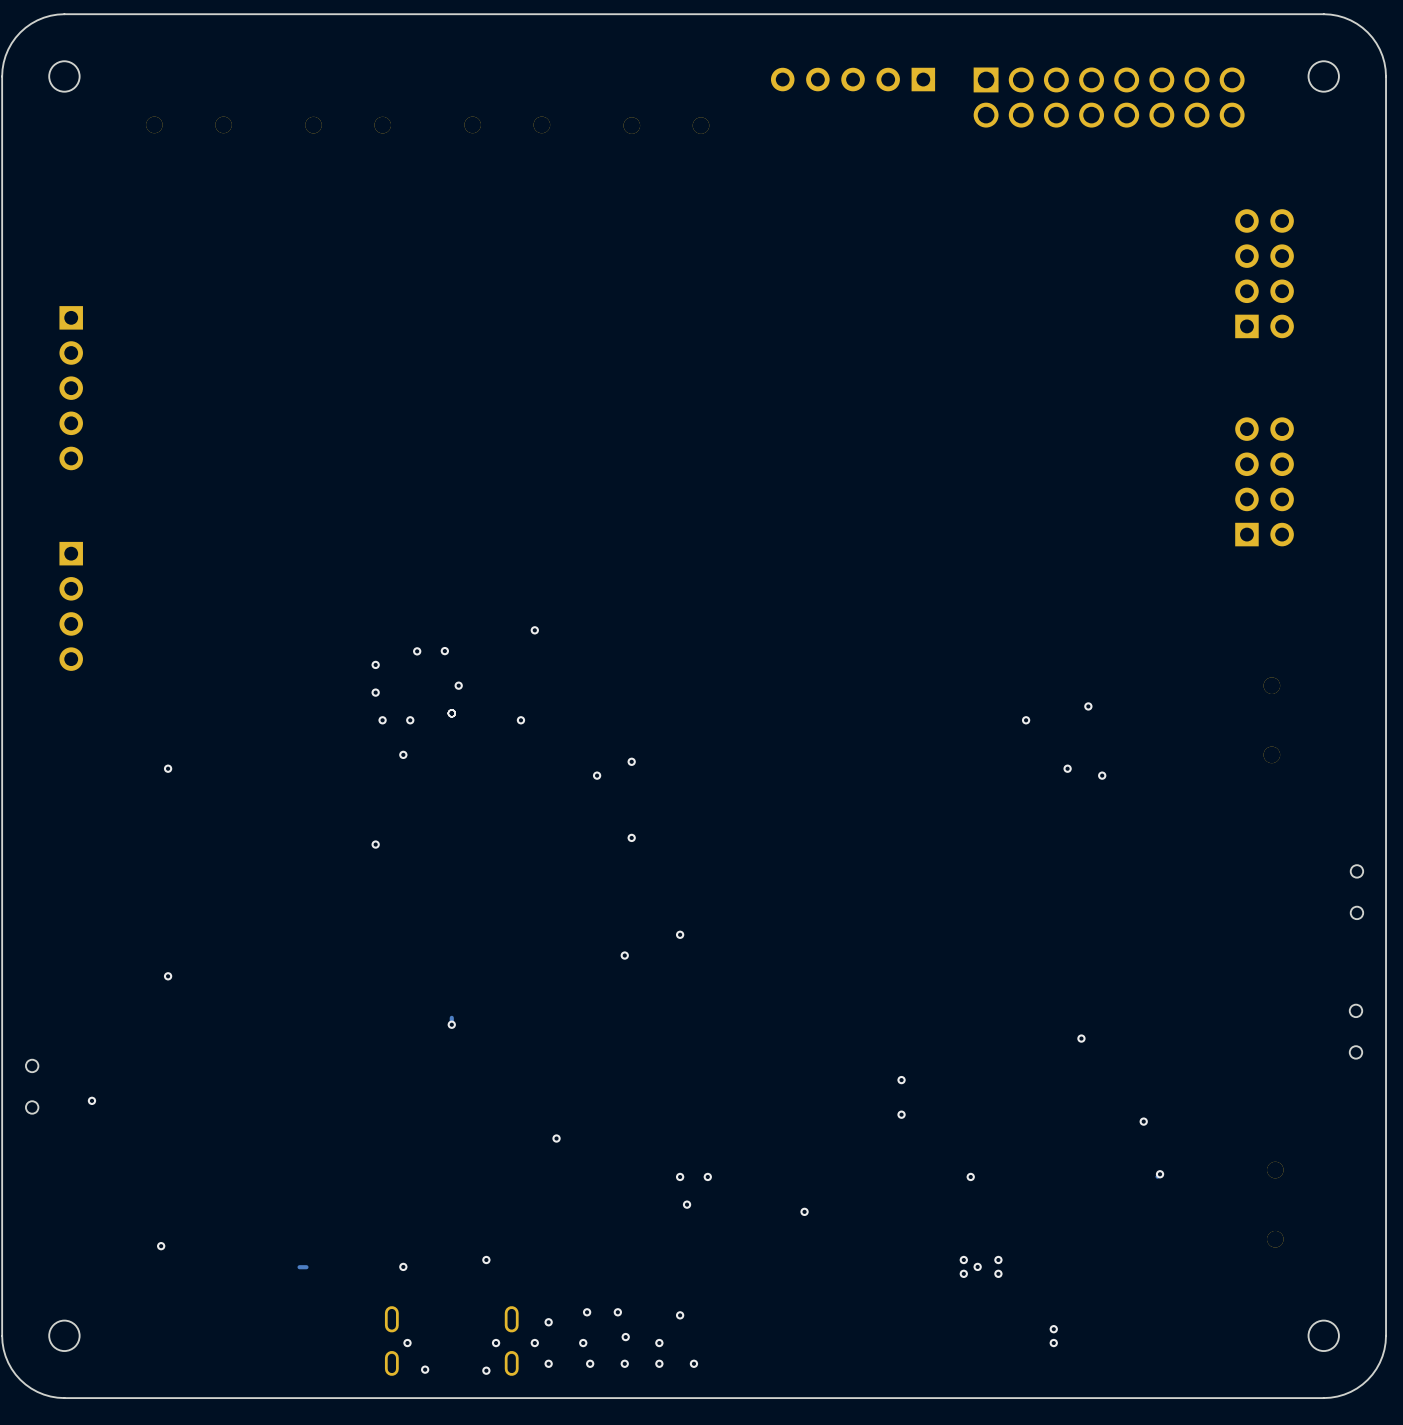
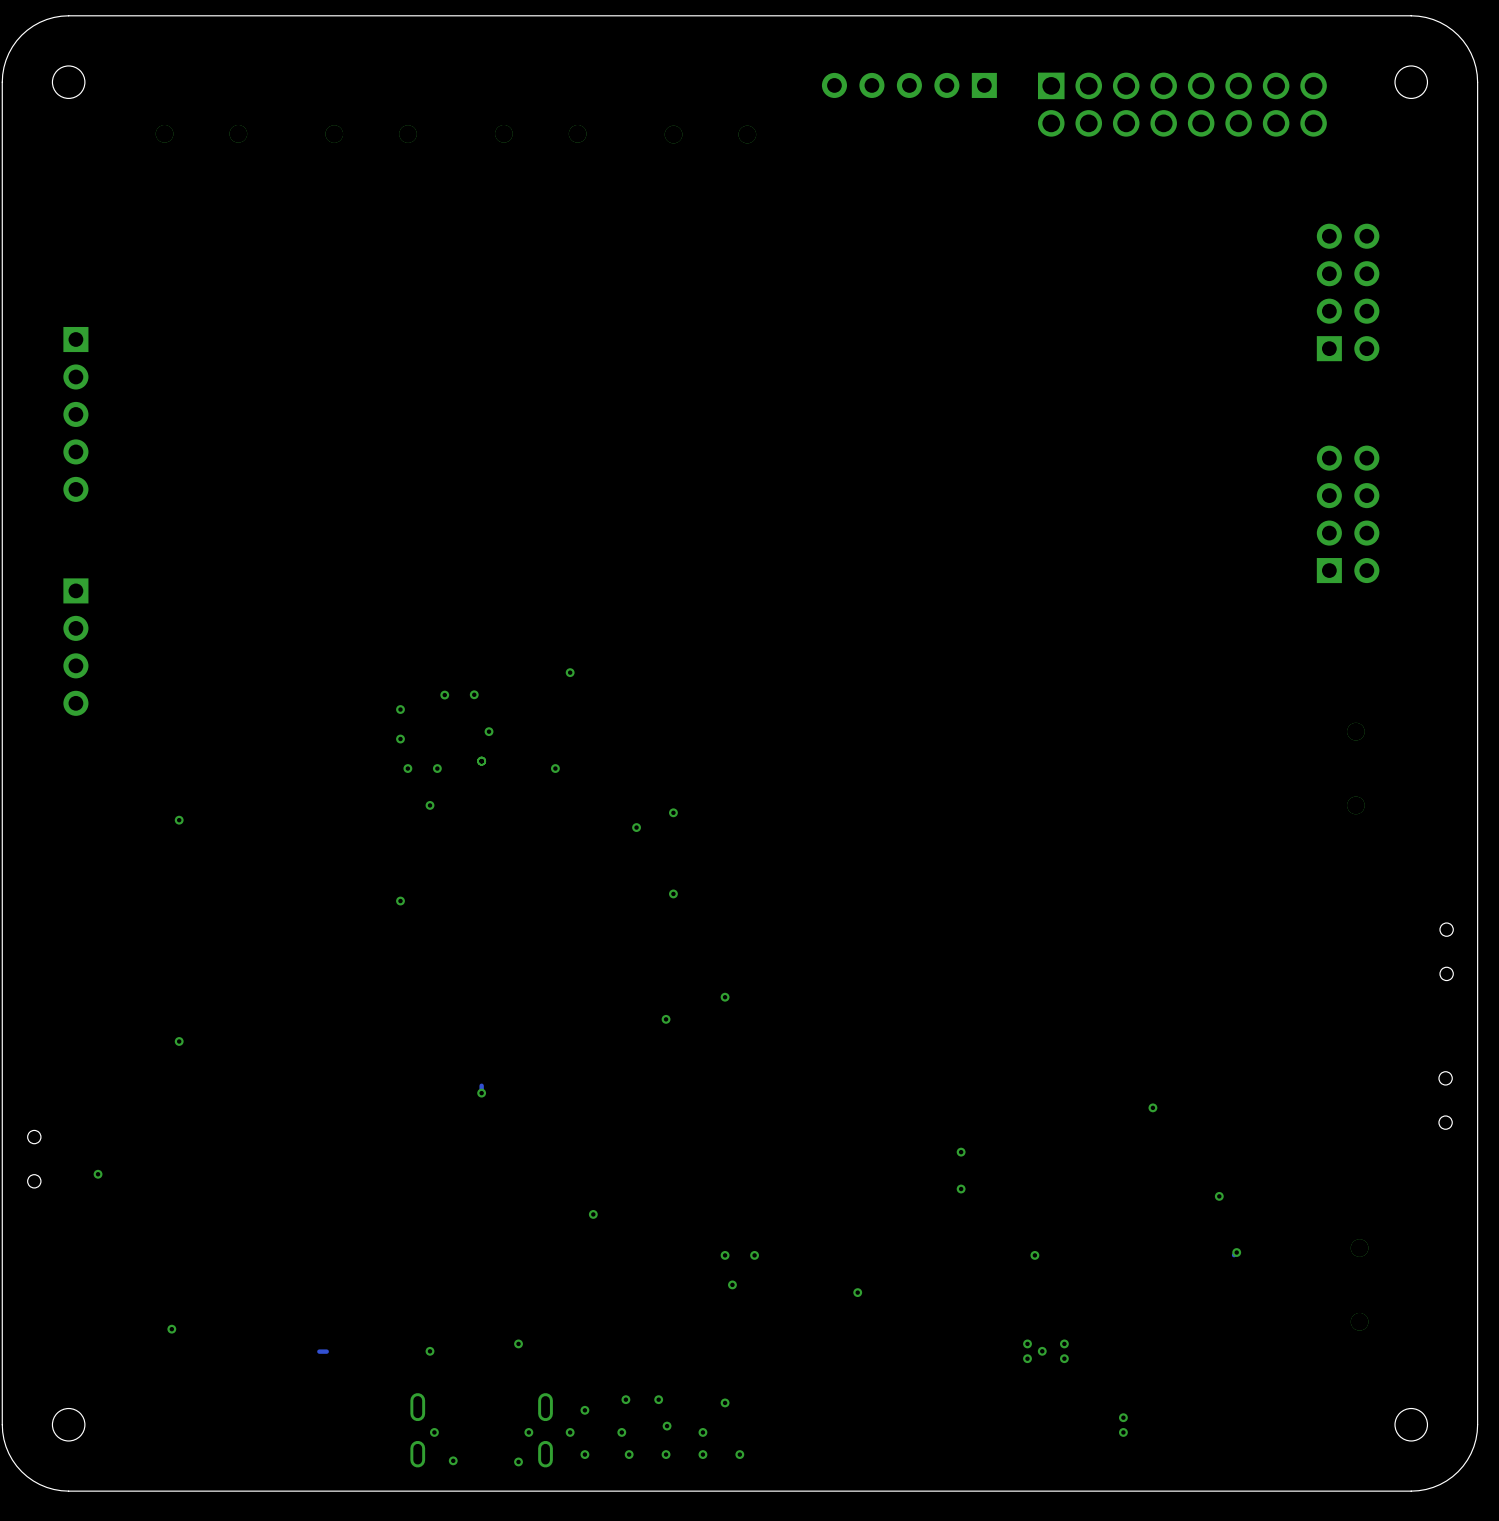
via: (1088, 706) -> none
via: (1026, 720) -> none
via: (1067, 768) -> none
via: (1102, 775) -> none

